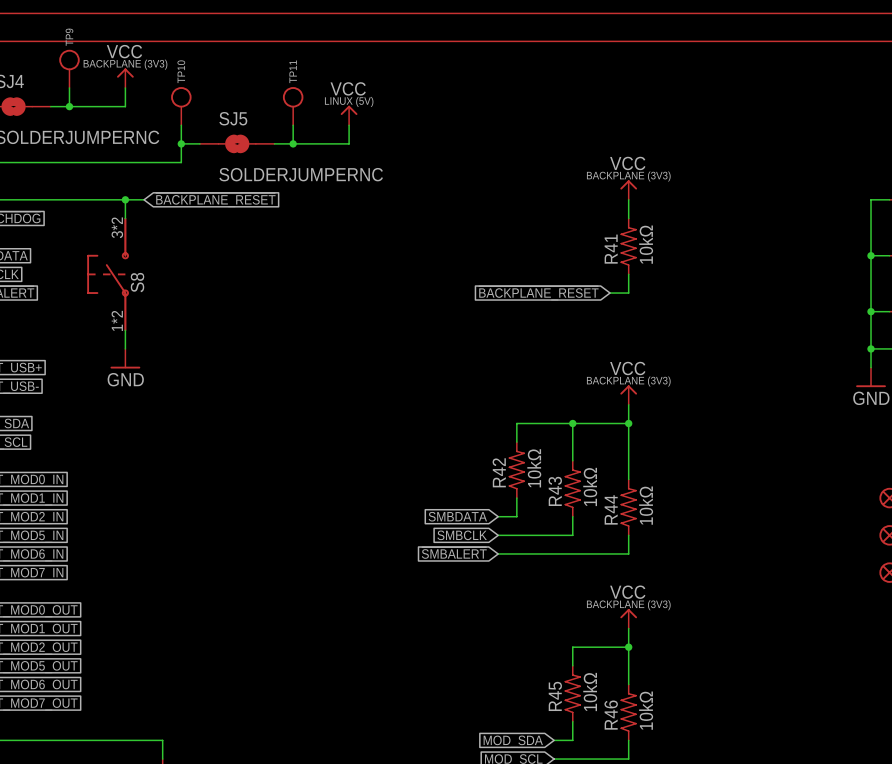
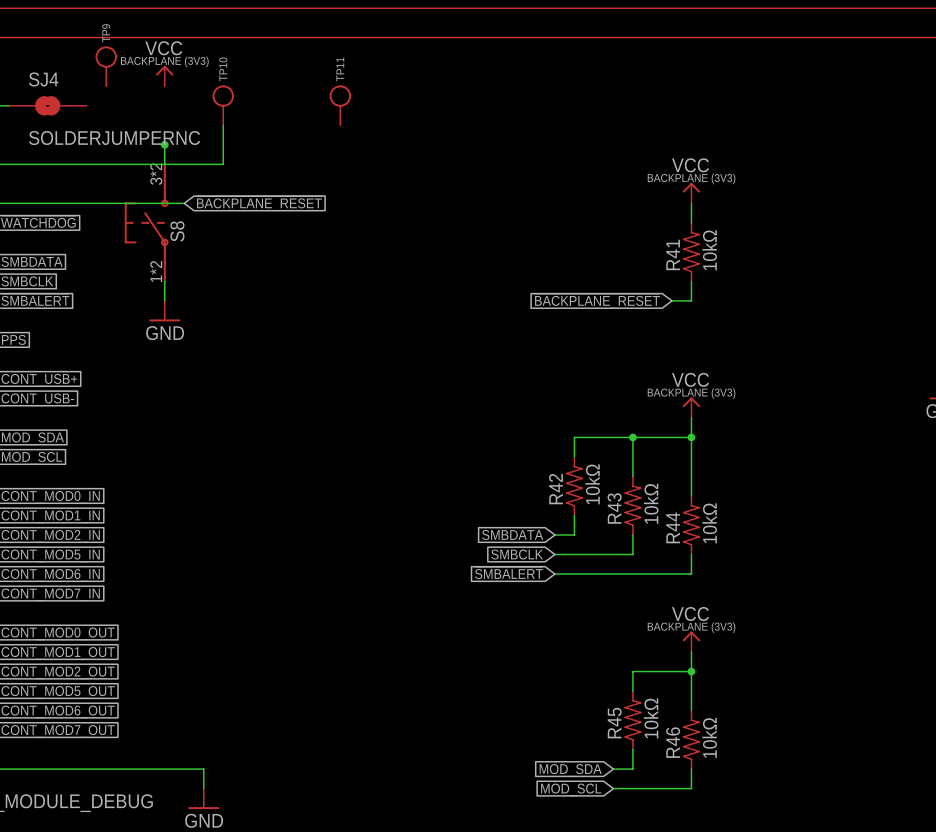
wire: (69, 87) (69, 106) -> none
wire: (125, 87) (125, 106) (50, 106) -> none
junction: (69, 106) -> none
power symbol: (349, 115) -> none
wire: (293, 125) (293, 143) -> none
wire: (349, 125) (349, 143) (274, 143) -> none
junction: none -> (164, 144)
wire: (181, 143) (199, 143) -> none
junction: (181, 143) -> none
SJ5: SOLDERJUMPERNC (237, 143) -> none
junction: (293, 143) -> none
wire: (125, 199) (125, 218) -> (164, 144) (164, 164)
junction: (125, 199) -> none
S8 position: (108, 274) -> (146, 222)
wire: (125, 330) (125, 348) -> (164, 281) (164, 300)
power symbol position: GND (125, 358) -> GND (164, 311)

